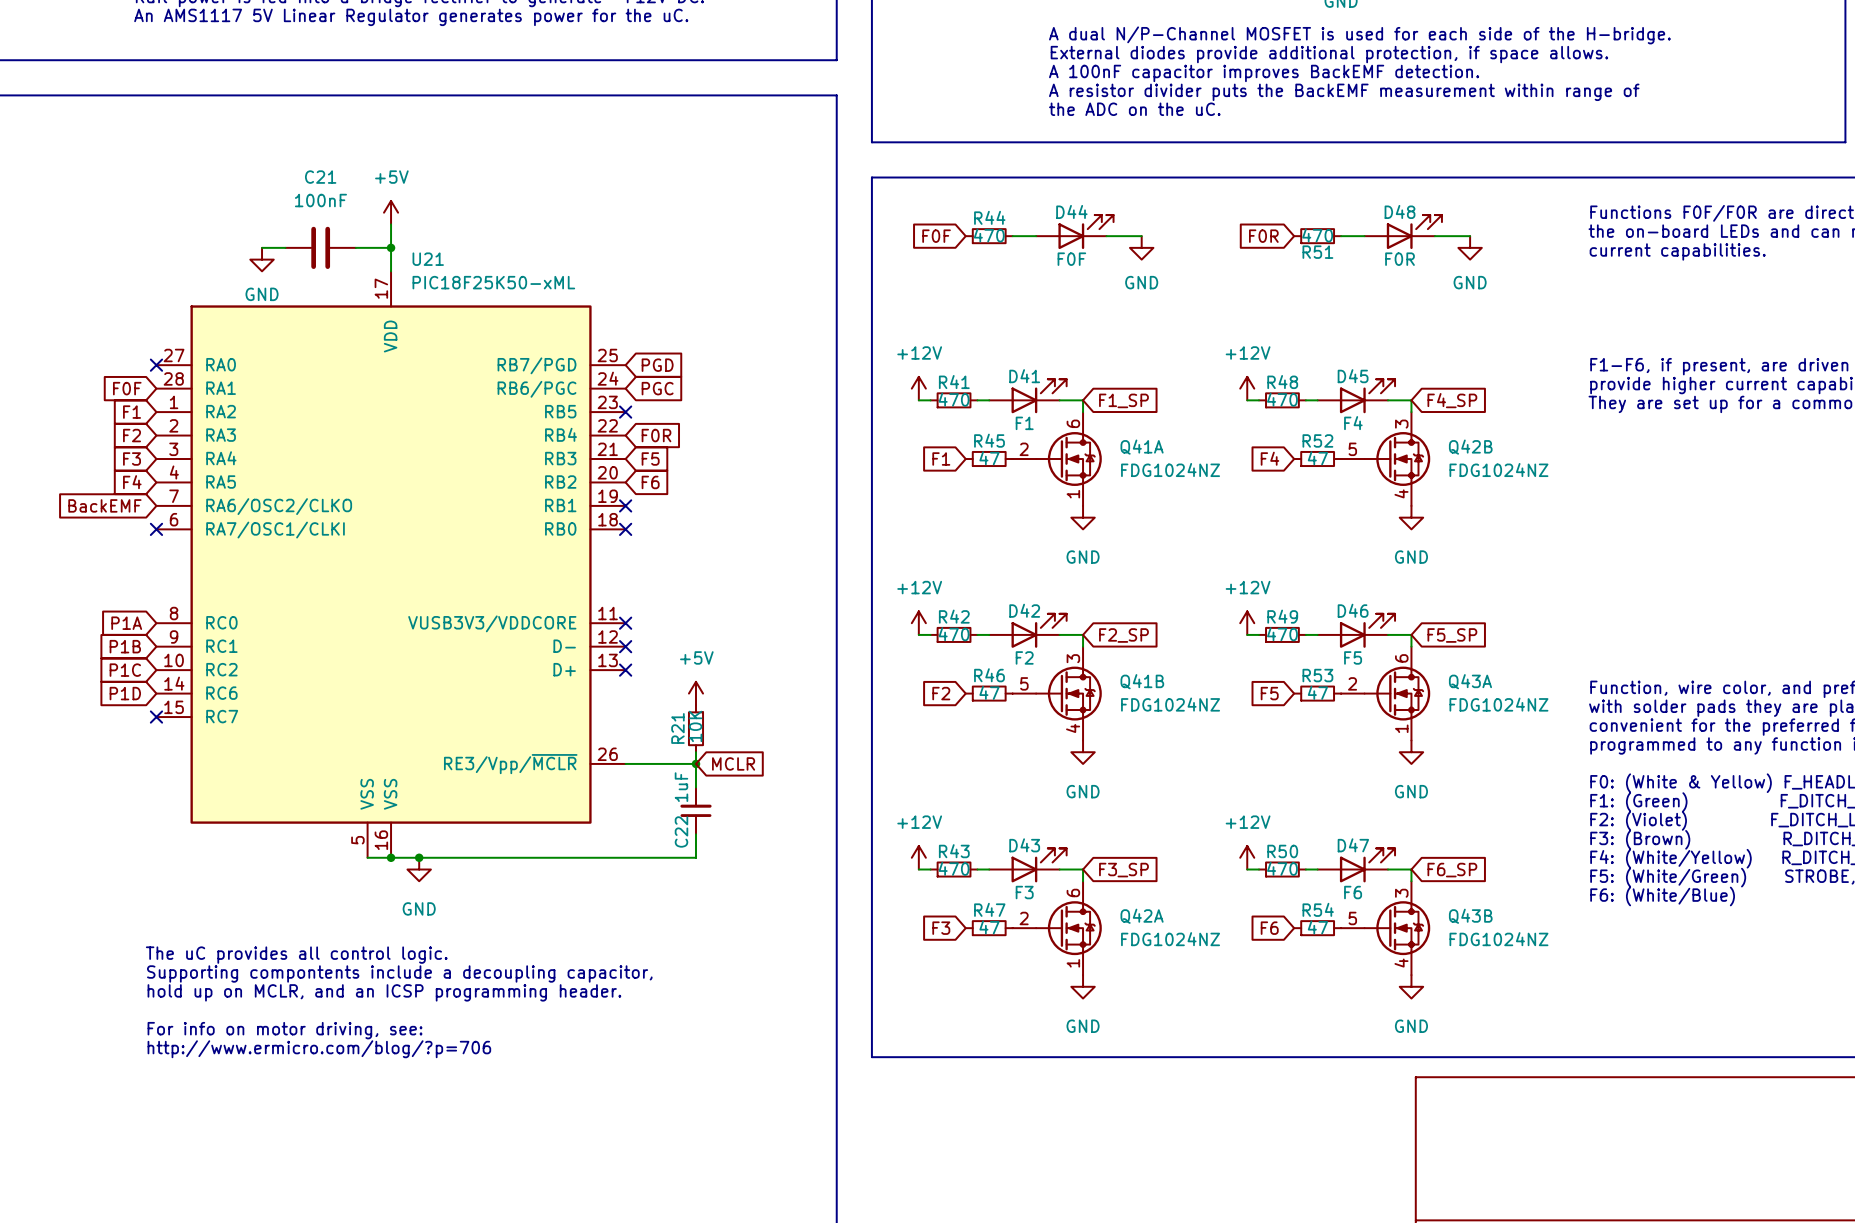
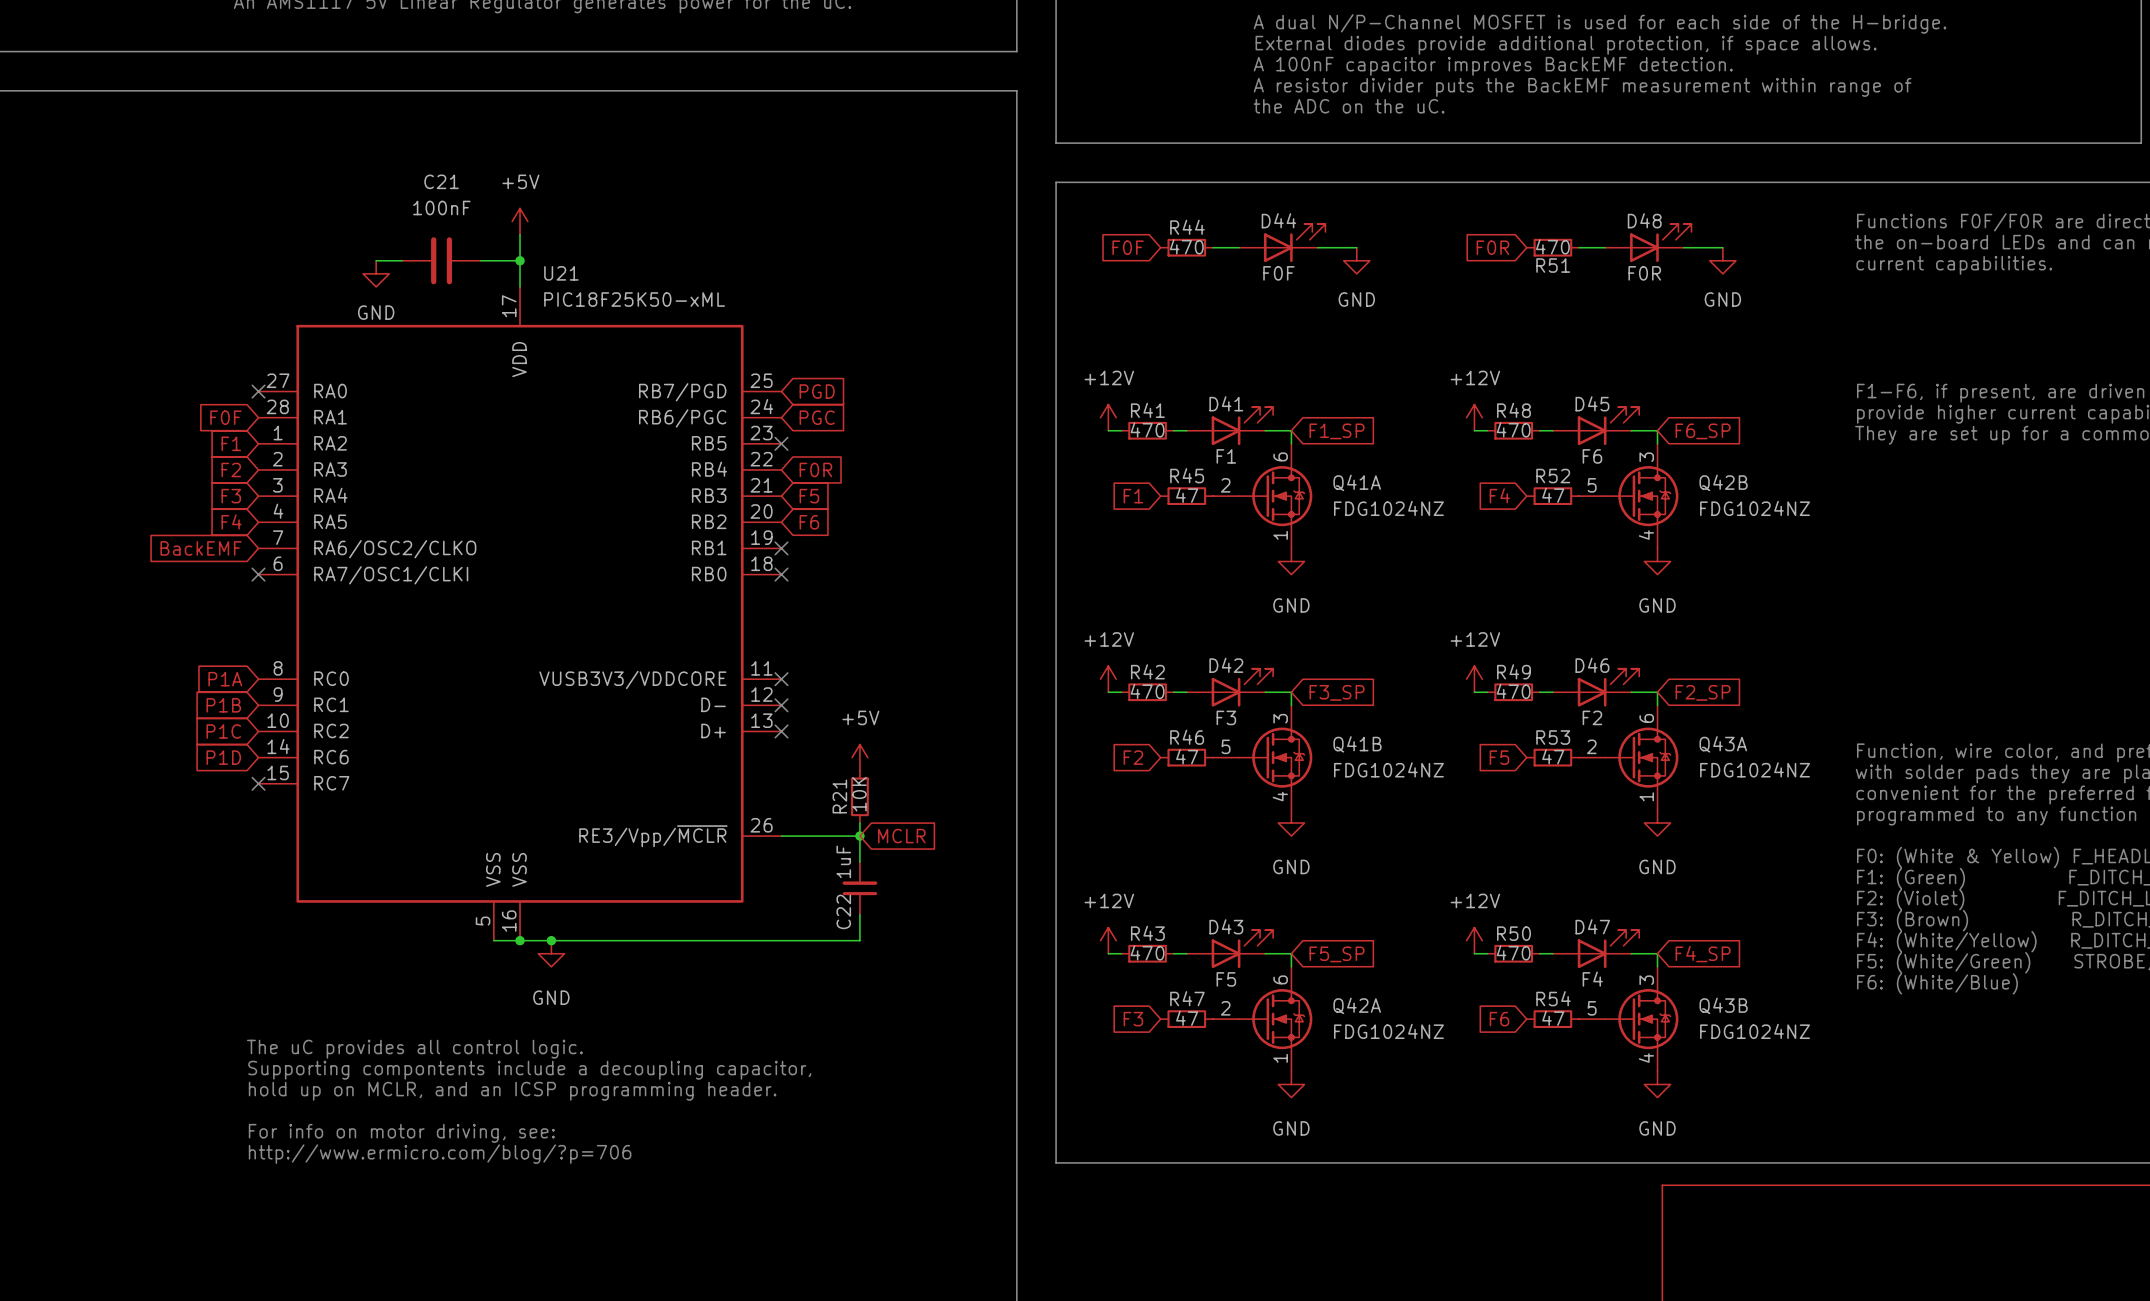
global label: F4_SP (1452, 400) -> F6_SP (1703, 431)
D45 value: F4 (1353, 423) -> F6 (1592, 456)
global label: F2_SP (1123, 635) -> F3_SP (1337, 692)
global label: F5_SP (1452, 635) -> F2_SP (1703, 692)
D42 value: F2 (1024, 657) -> F3 (1226, 717)
D46 value: F5 (1353, 657) -> F2 (1592, 717)
global label: F3_SP (1123, 870) -> F5_SP (1337, 954)
global label: F6_SP (1452, 870) -> F4_SP (1703, 954)
D43 value: F3 (1024, 892) -> F5 (1226, 979)
D47 value: F6 (1353, 892) -> F4 (1592, 979)

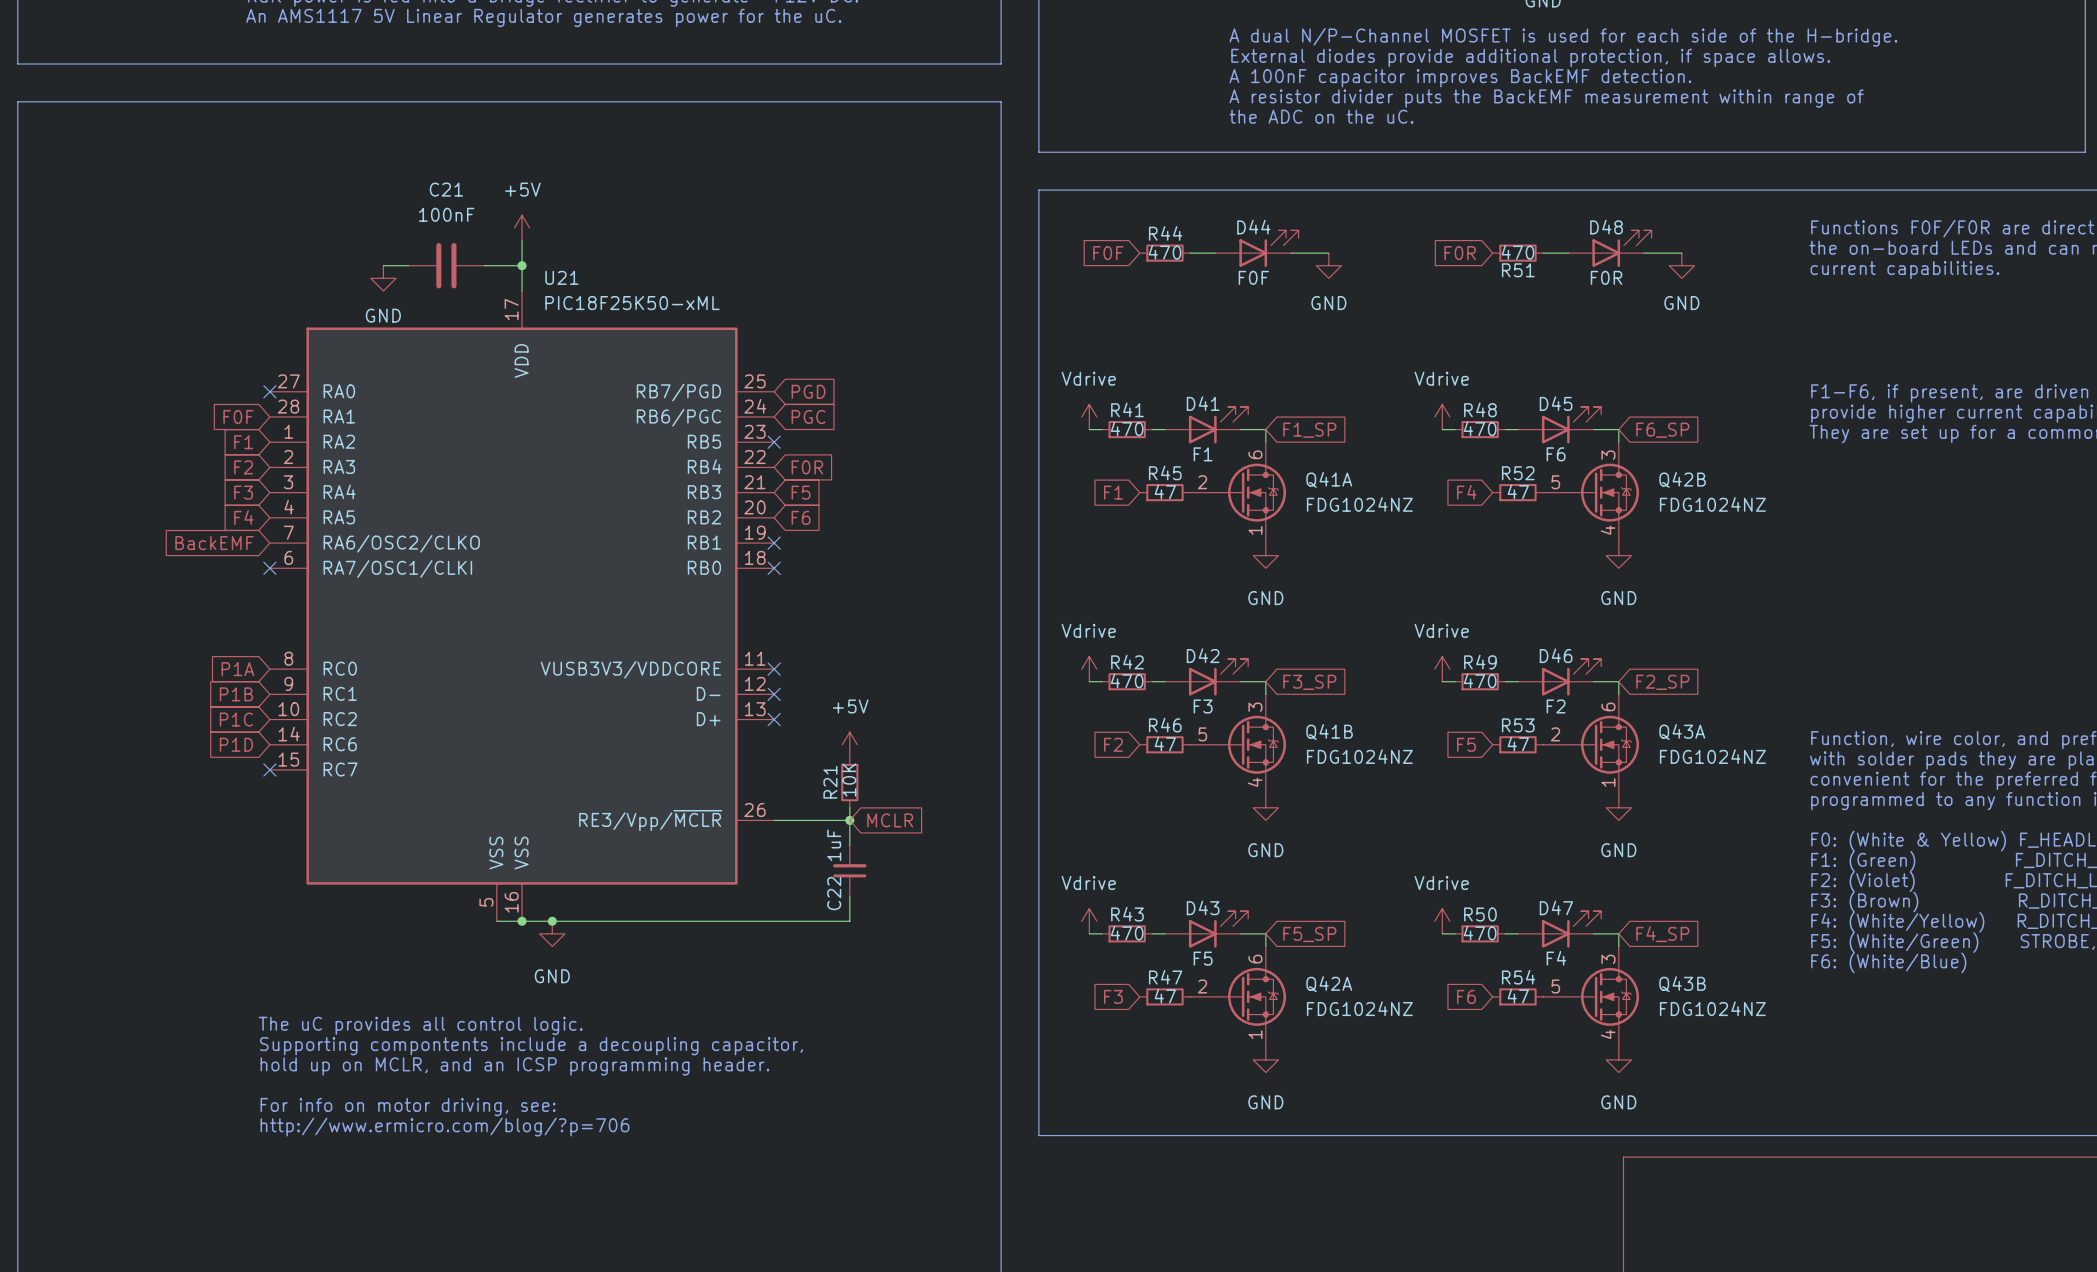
power symbol: +12V (1108, 417) -> Vdrive (1089, 416)
power symbol: +12V (1474, 417) -> Vdrive (1442, 416)
power symbol: +12V (1108, 679) -> Vdrive (1089, 669)
power symbol: +12V (1474, 679) -> Vdrive (1442, 669)
power symbol: +12V (1108, 940) -> Vdrive (1089, 921)
power symbol: +12V (1474, 940) -> Vdrive (1442, 921)

